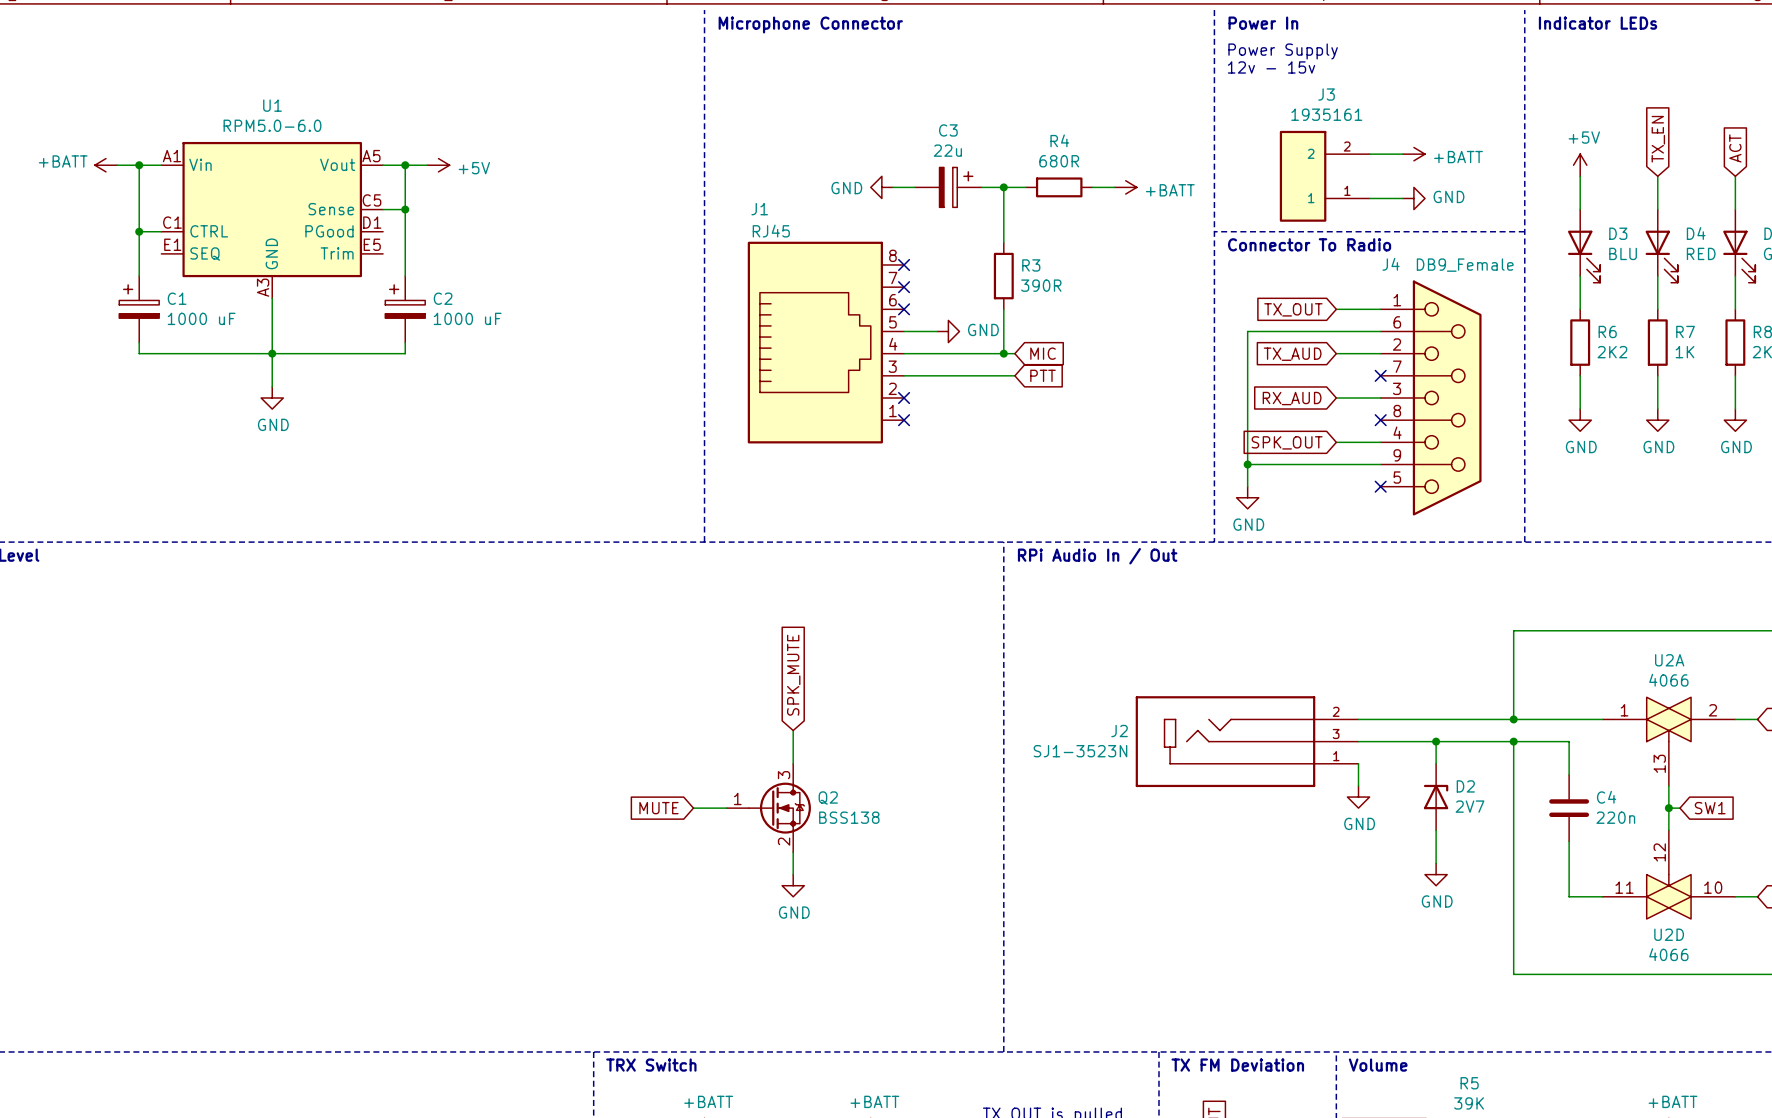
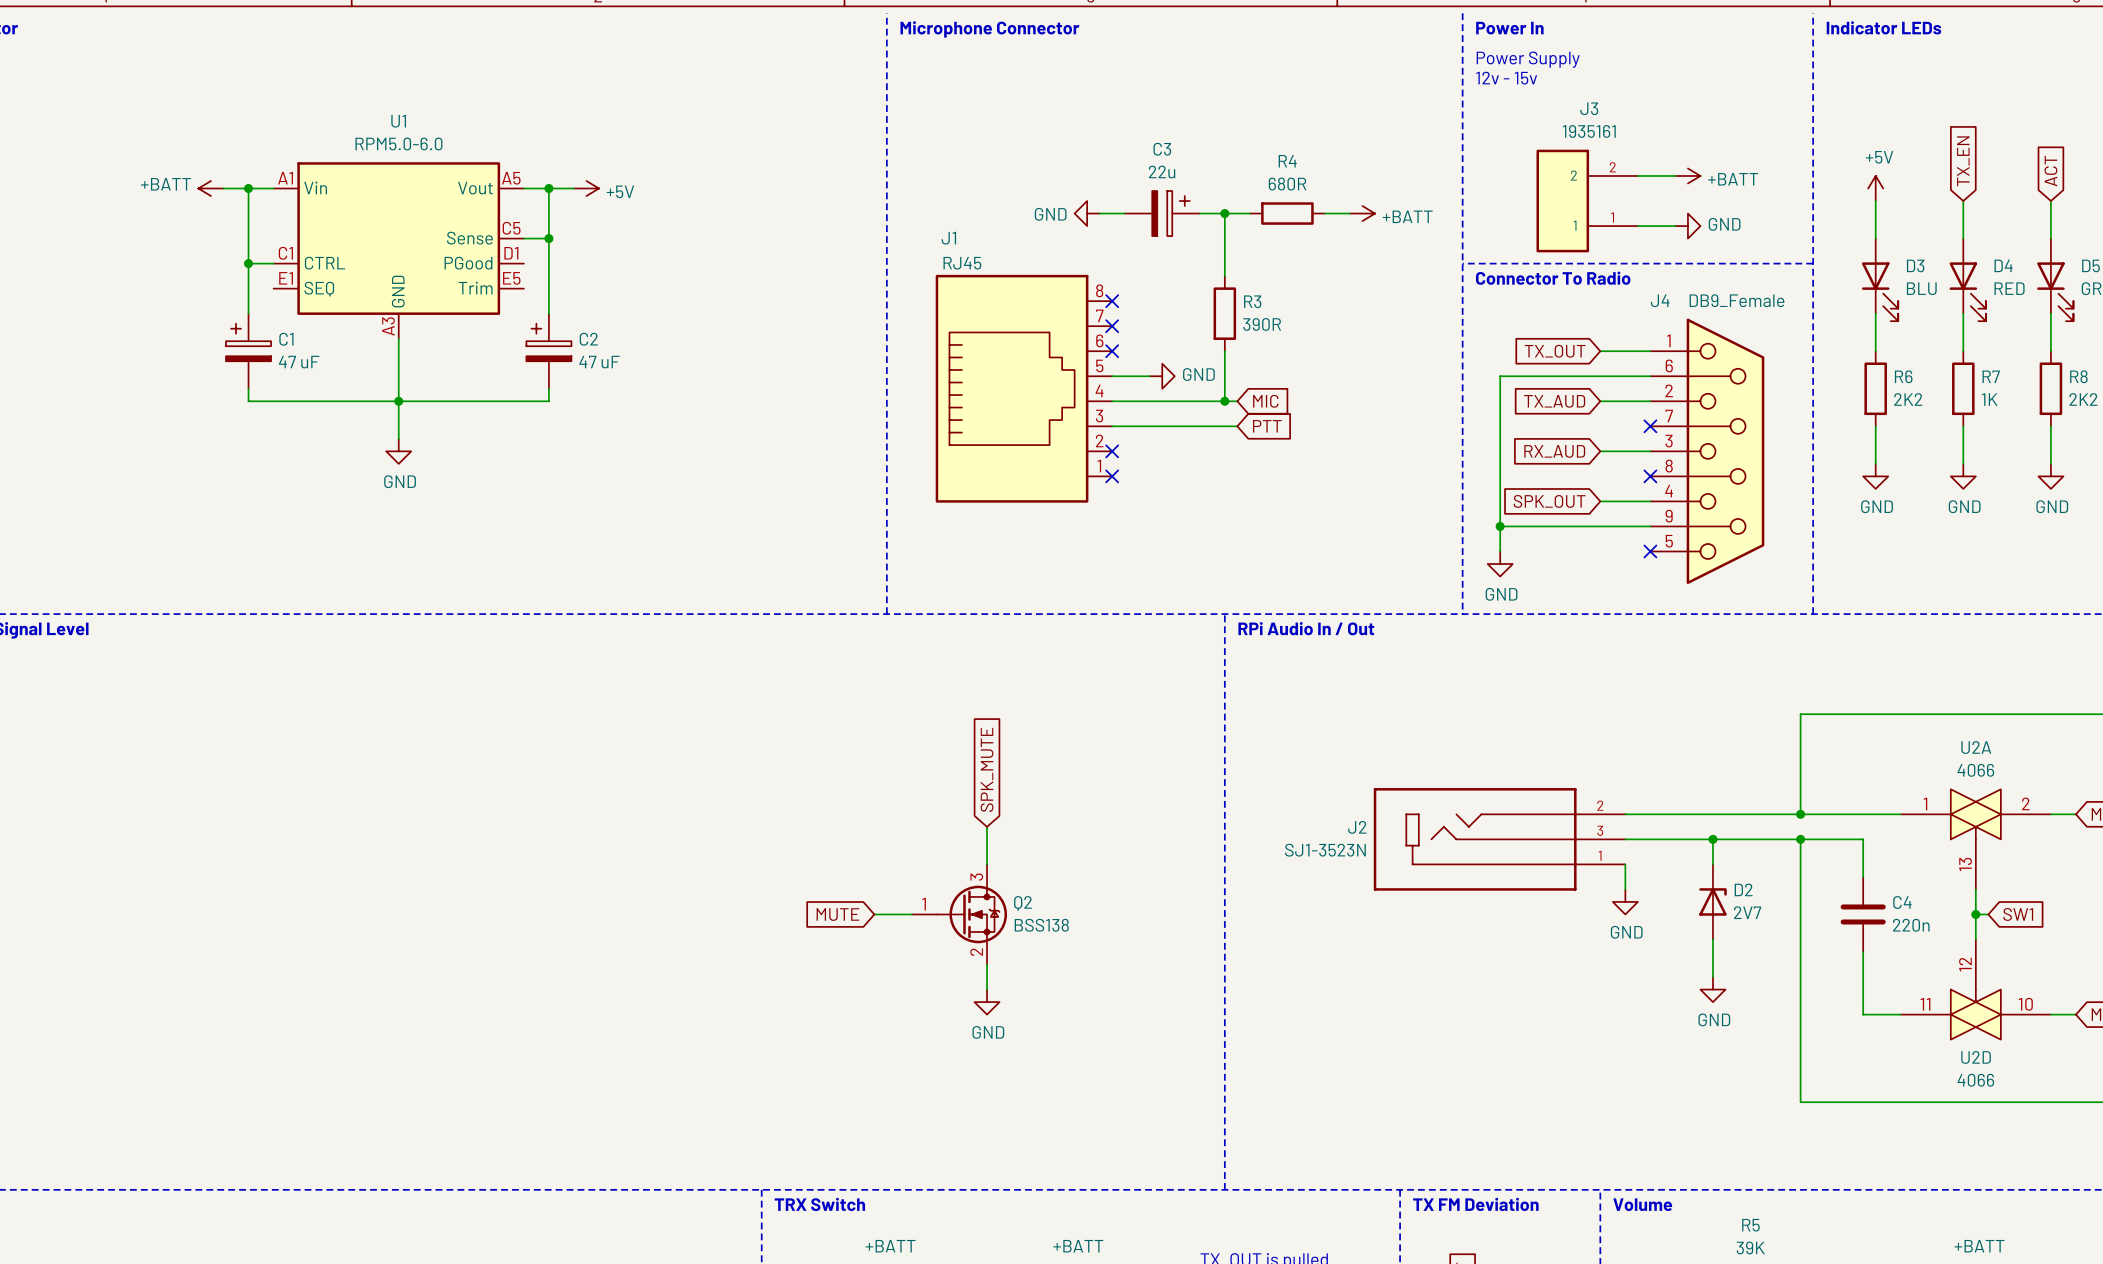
C1 value: 1000 uF (201, 318) -> 47 uF (299, 362)
C2 value: 1000 uF (467, 318) -> 47 uF (599, 362)

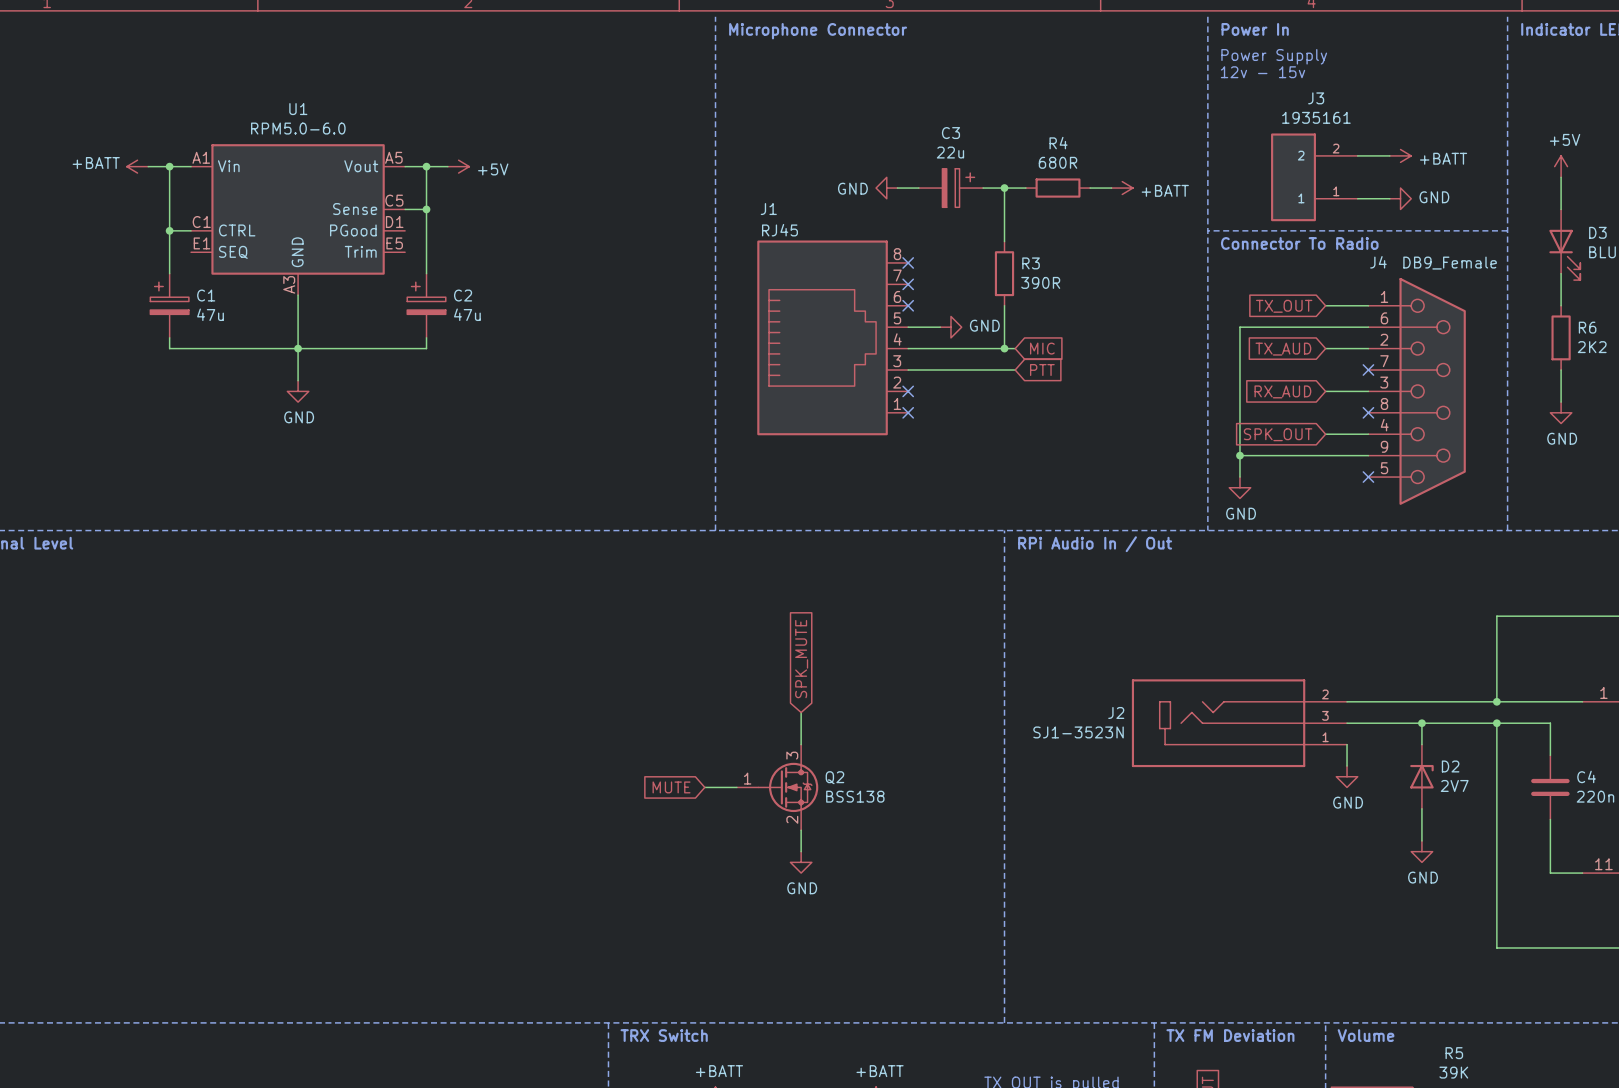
C1 value: 47 uF (299, 362) -> 47u (210, 314)
C2 value: 47 uF (599, 362) -> 47u (467, 314)

